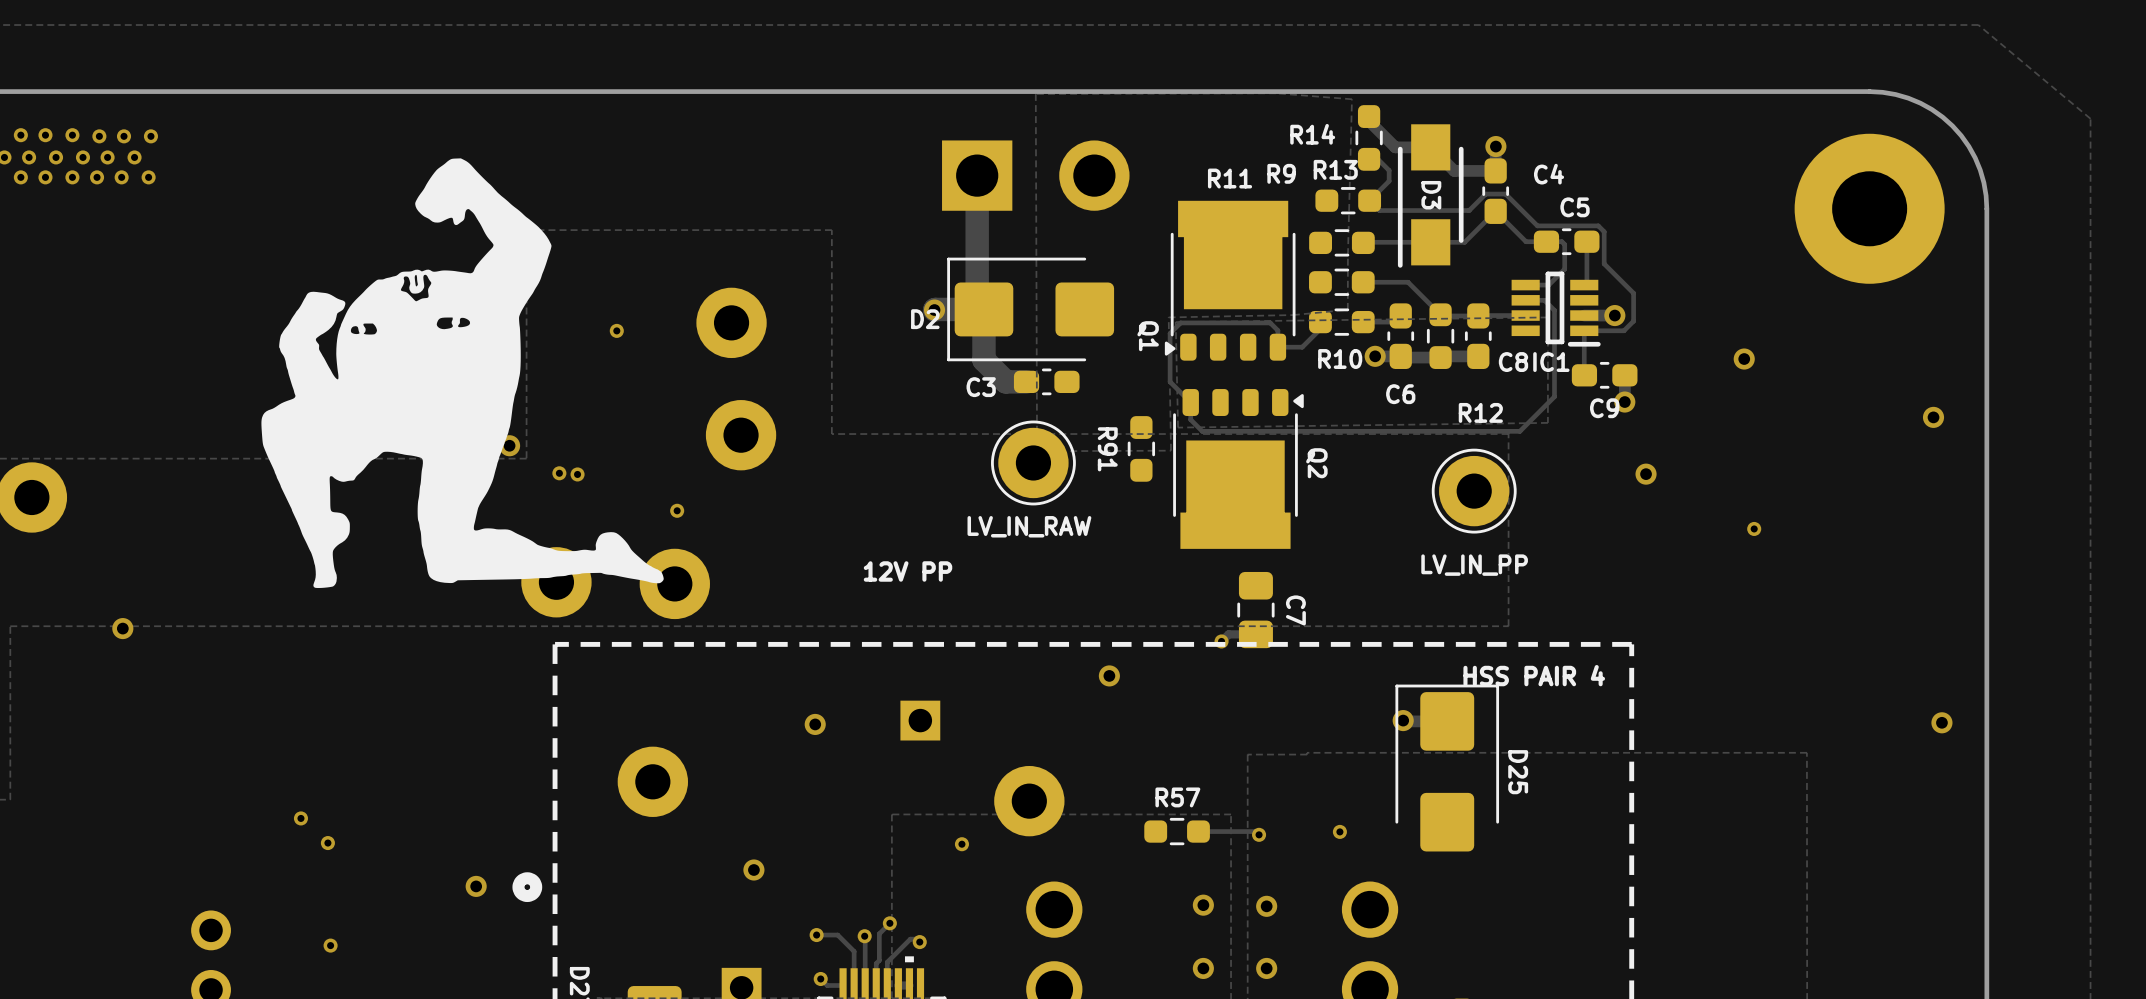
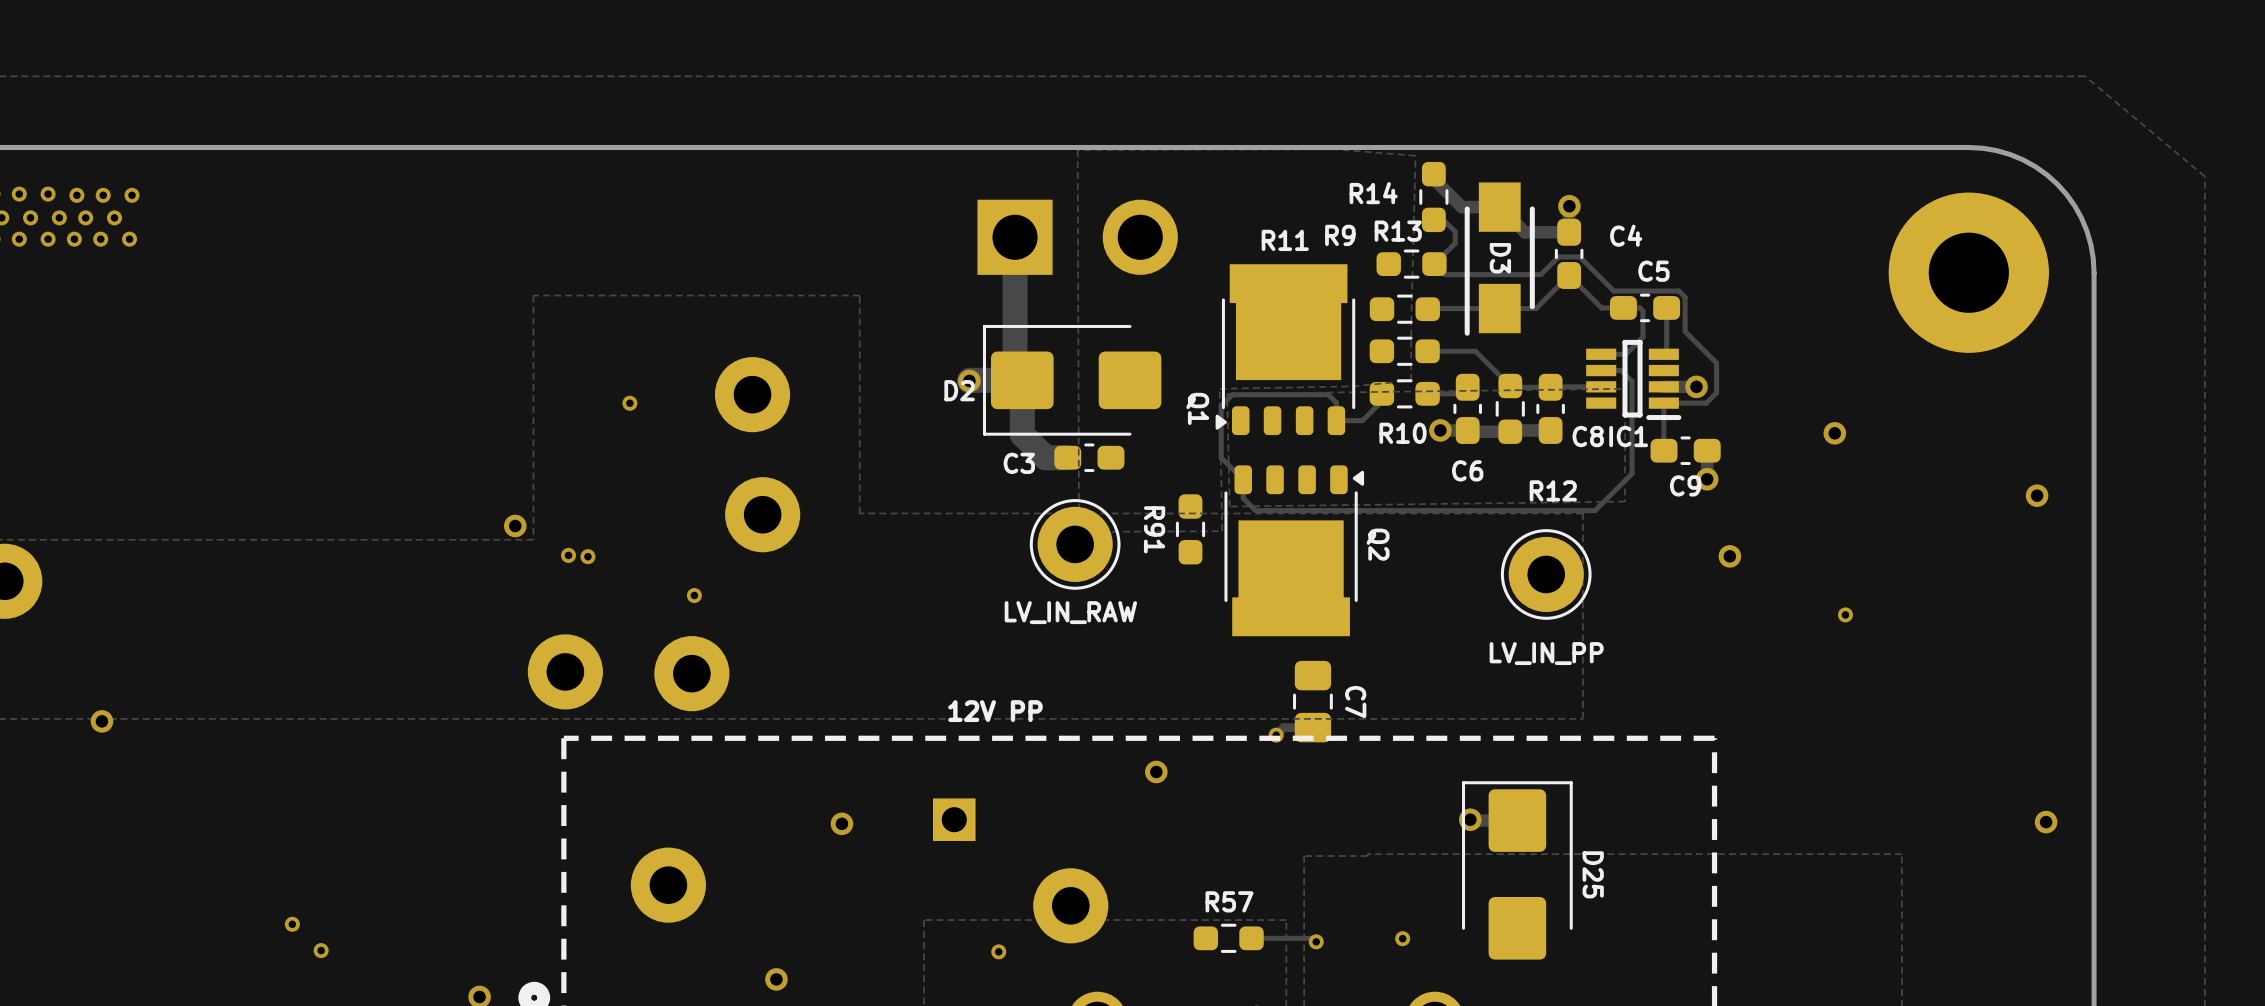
part: (462, 373) -> none
text position: 12V PP (908, 571) -> 12V PP (995, 711)
text: HSS PAIR 4 (1534, 675) -> none

